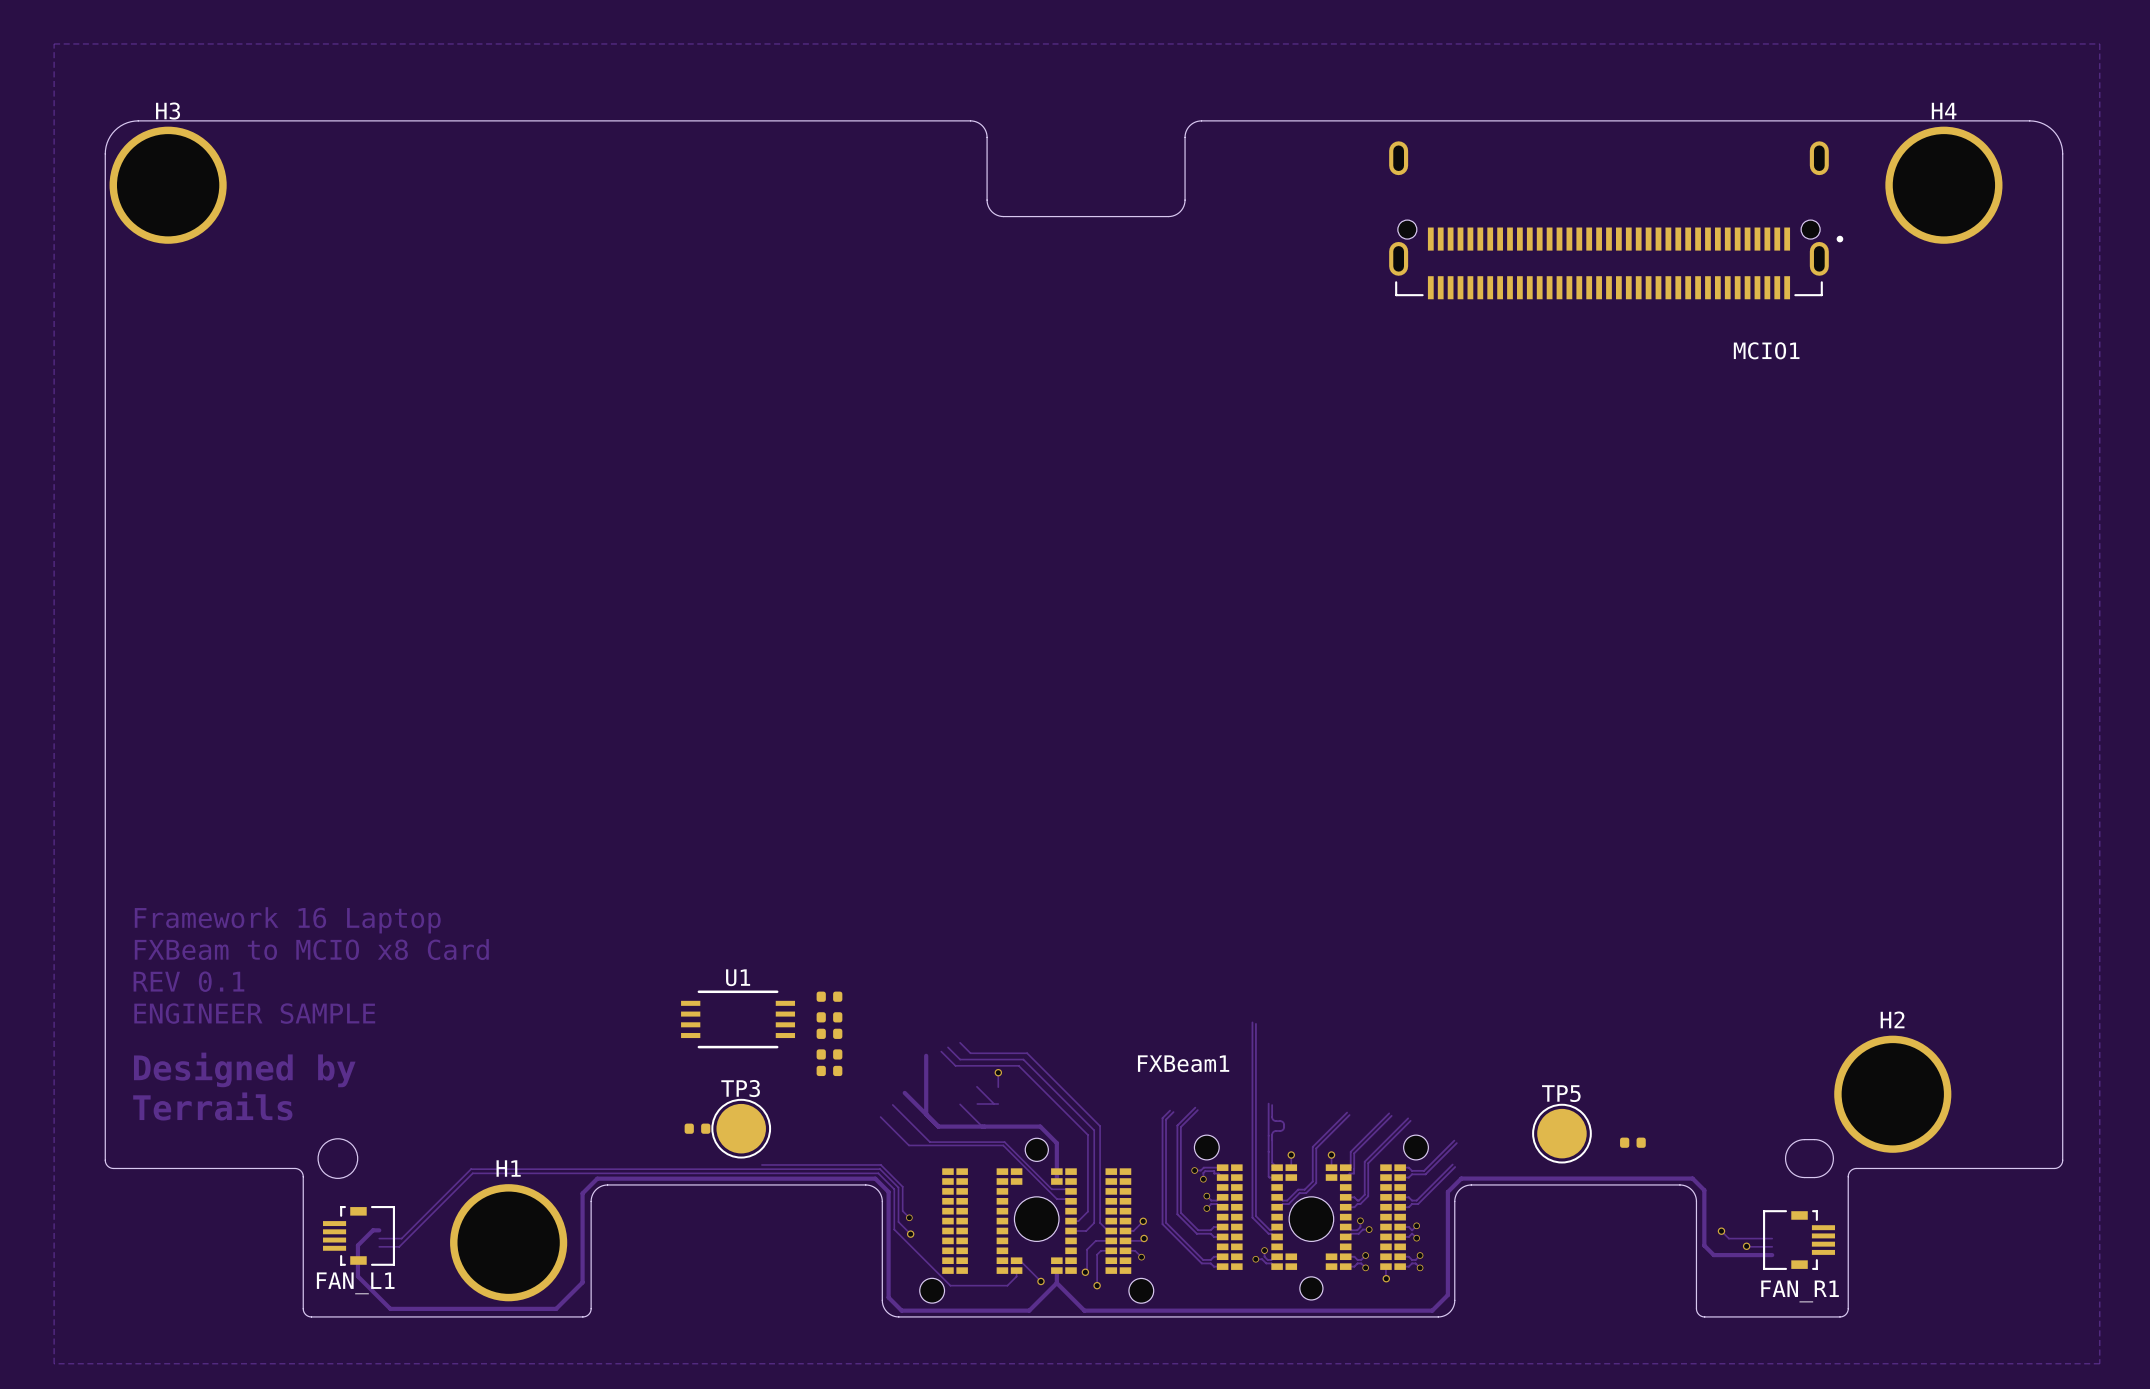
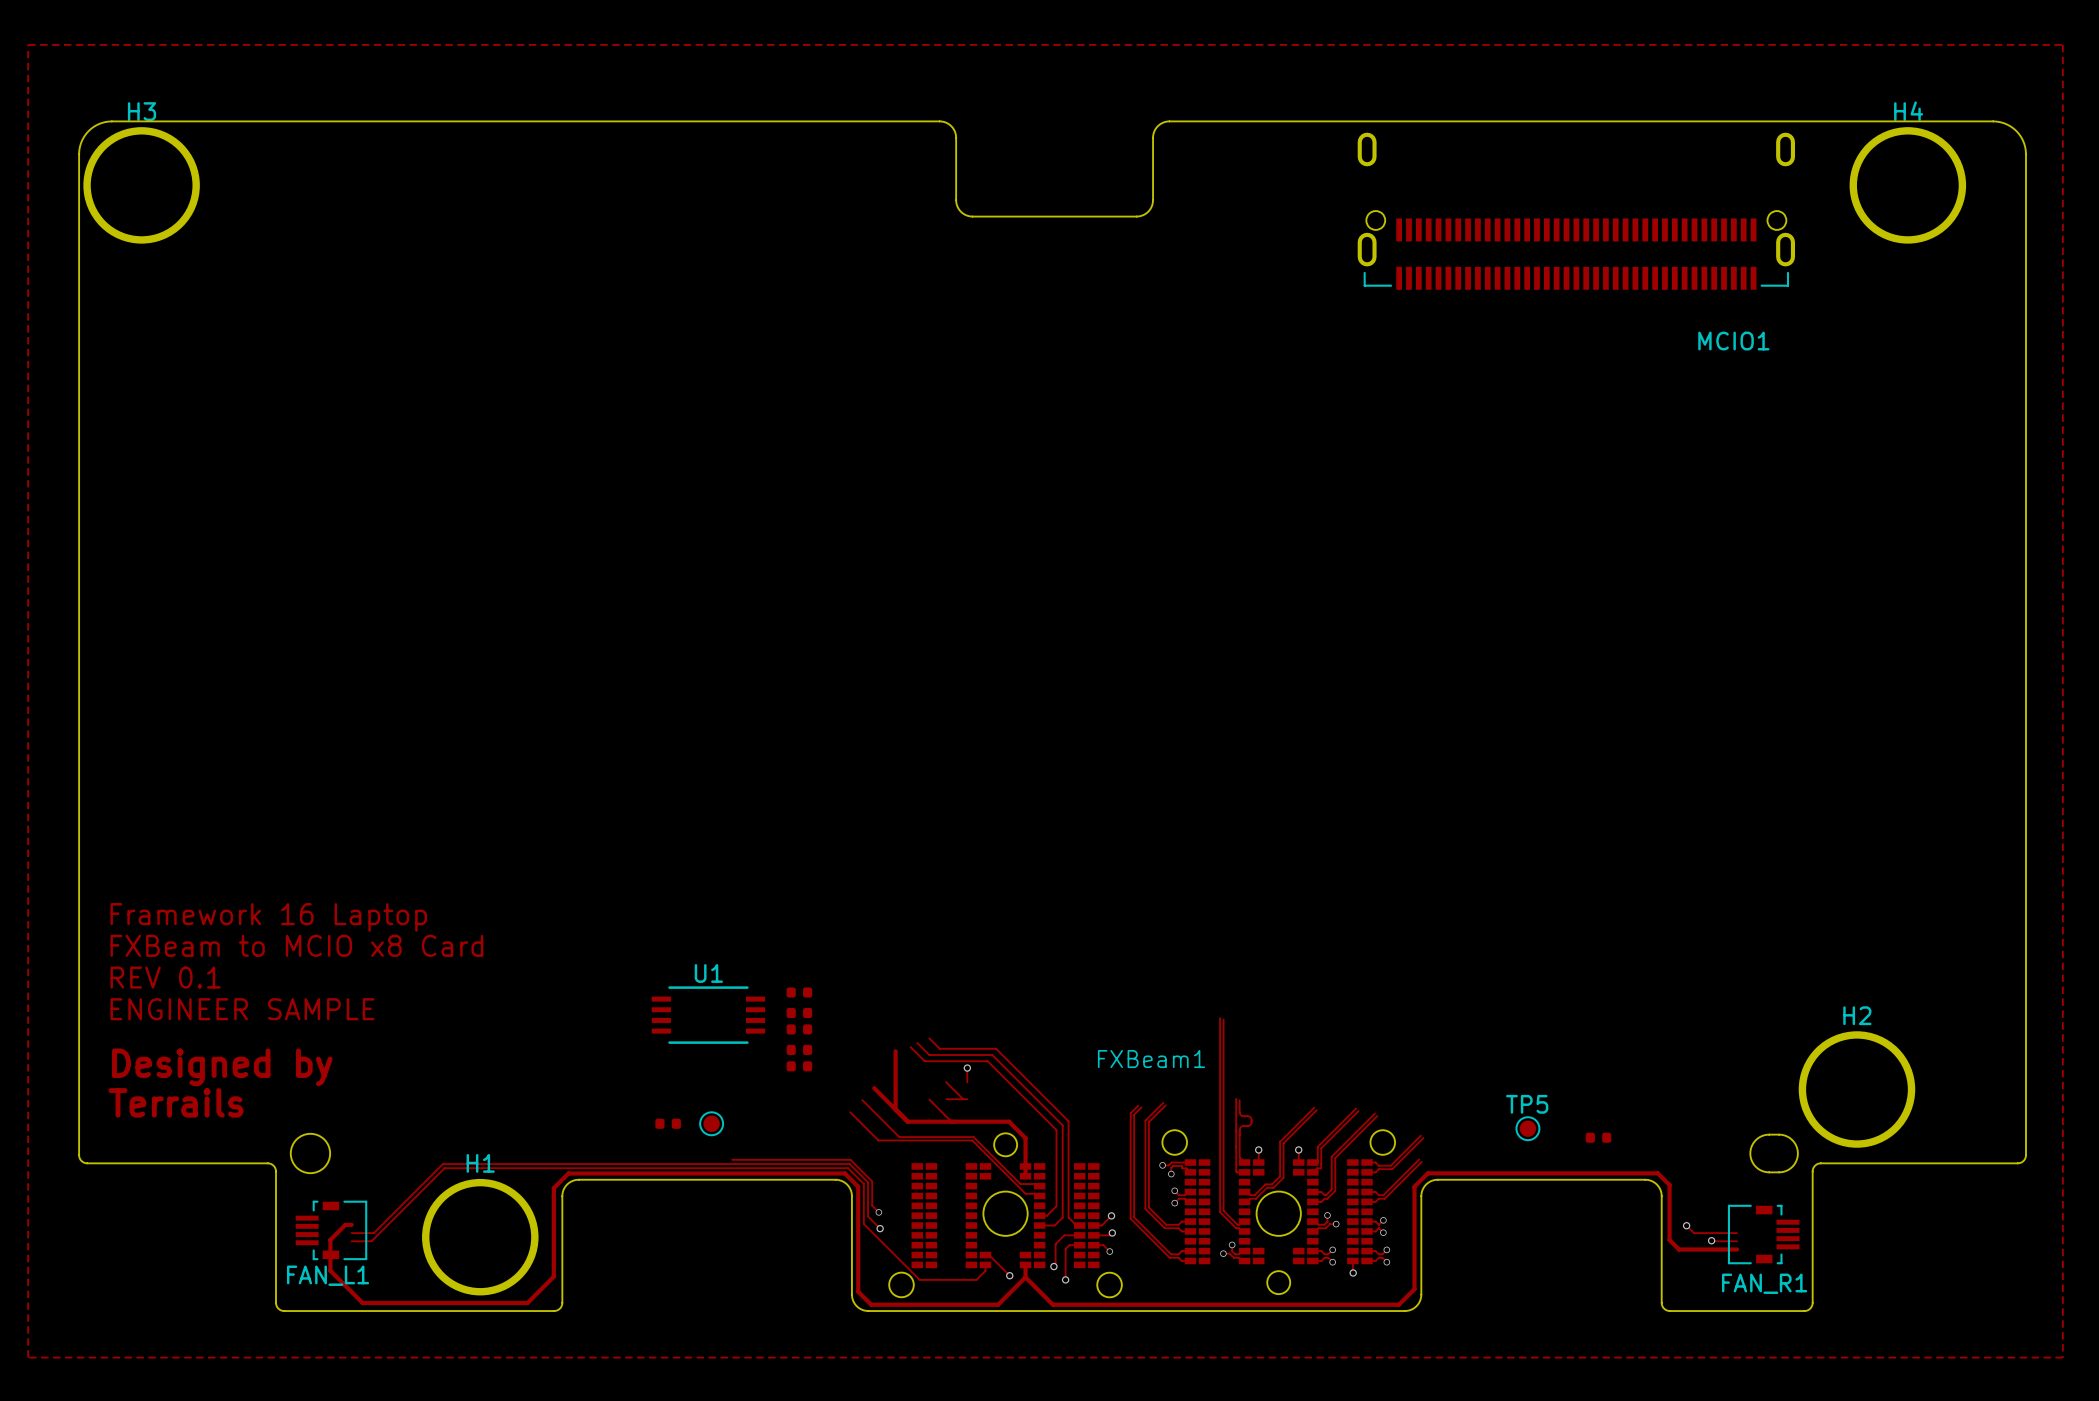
MCIO1 footprint: [1389, 141, 1844, 300] -> [1357, 132, 1795, 290]
TP5 footprint: [1532, 1103, 1592, 1164] -> [1515, 1116, 1541, 1142]
TP3: (741, 1128) -> none
part: none -> (711, 1123)

